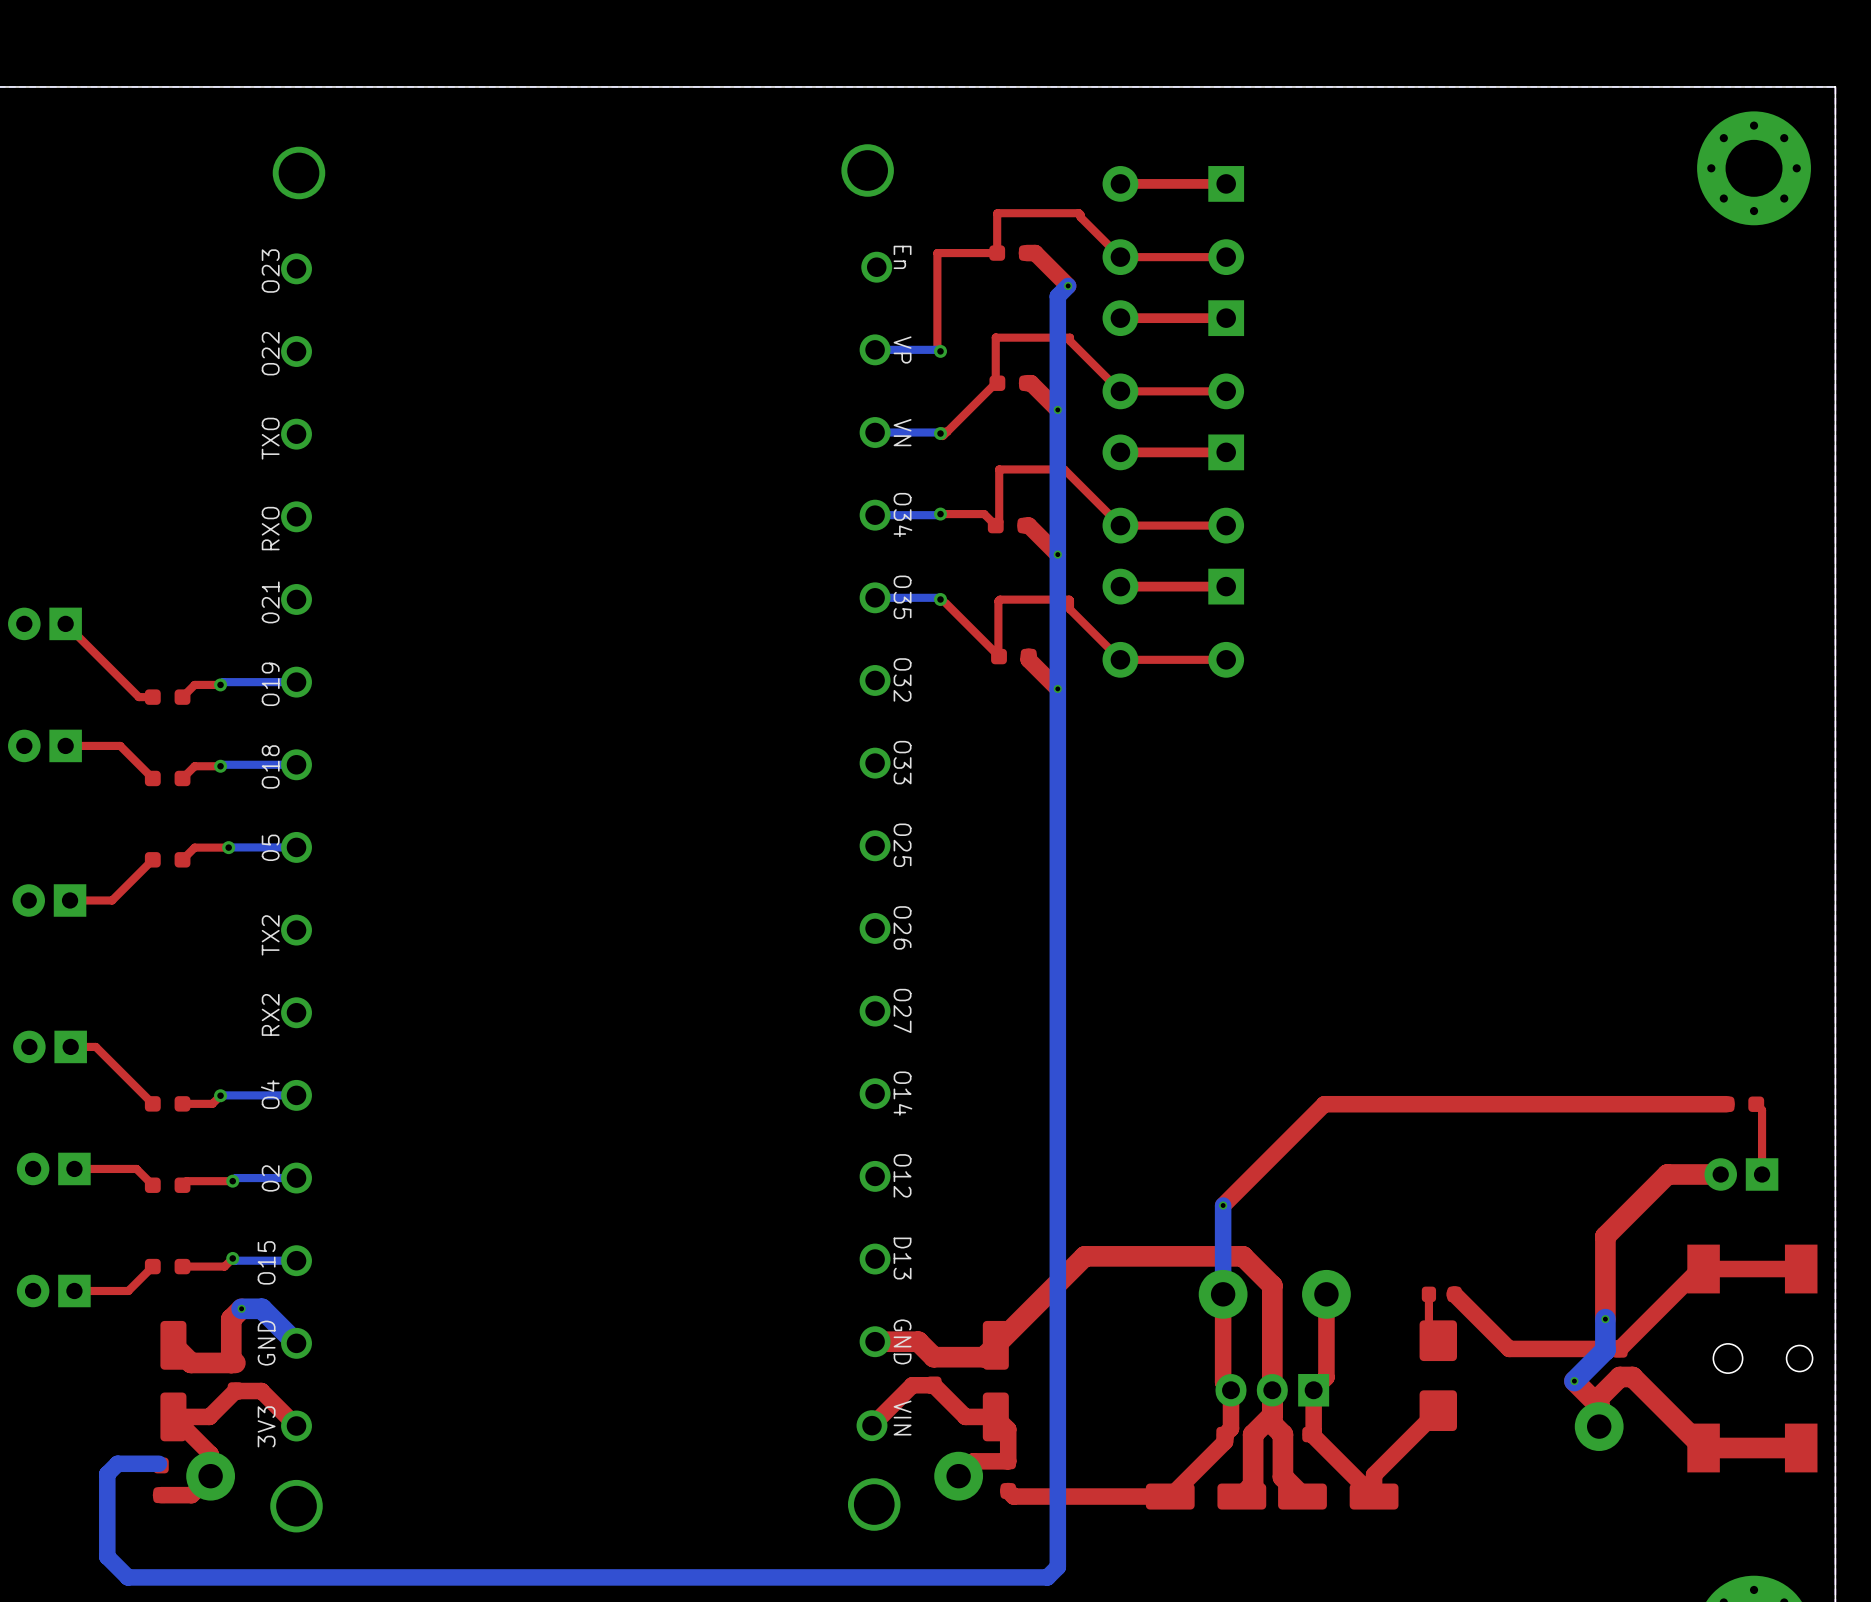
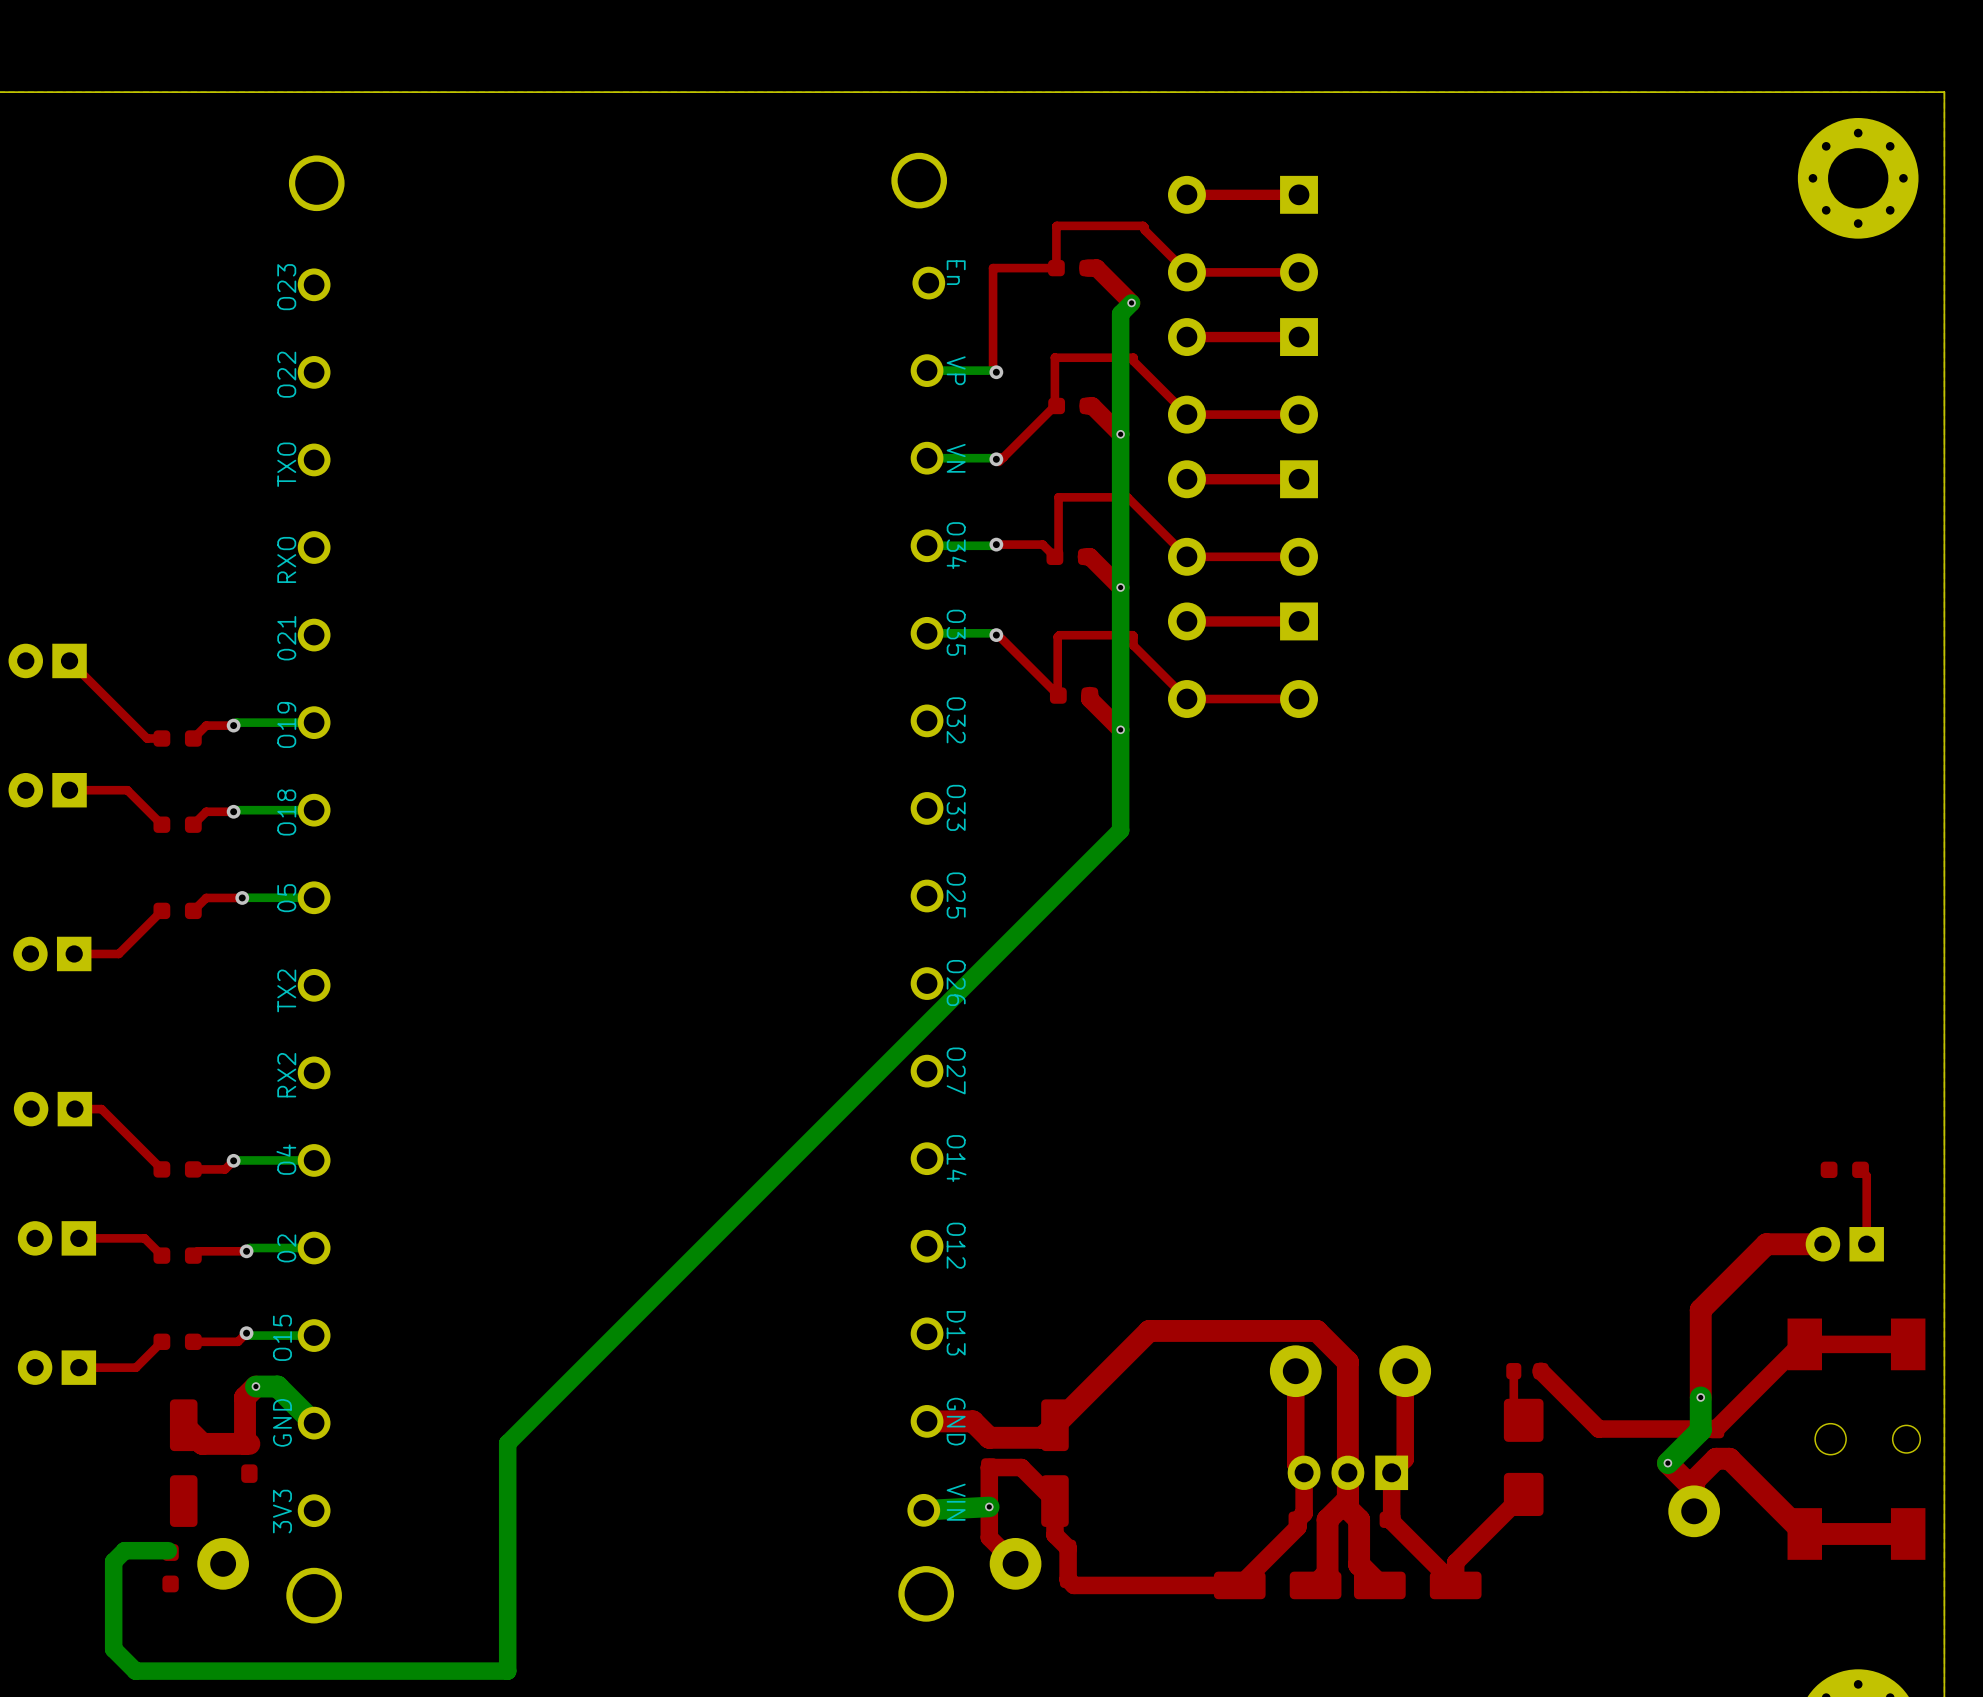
bottom track: (1057, 783) (1057, 1567) (1047, 1577) (479, 1577) -> (1120, 830) (507, 1443) (507, 1671)
top track: (1726, 1104) (1324, 1104) (1223, 1205) -> none
bottom track: (1223, 1205) (1223, 1294) -> none
via: (1223, 1205) -> none
bottom track: none -> (989, 1506) (923, 1510)
via: none -> (989, 1506)
top track: (871, 1425) (912, 1385) (933, 1385) (965, 1416) (995, 1416) (1008, 1429) (1008, 1461) (973, 1461) (958, 1476) -> (1068, 1579) (1068, 1548) (1054, 1534) (1054, 1501) (1021, 1467) (989, 1467) (989, 1537) (1015, 1563)
top track: (296, 1426) (261, 1391) (235, 1391) (209, 1416) (173, 1416) (210, 1454) (210, 1476) (191, 1495) (161, 1495) -> none

